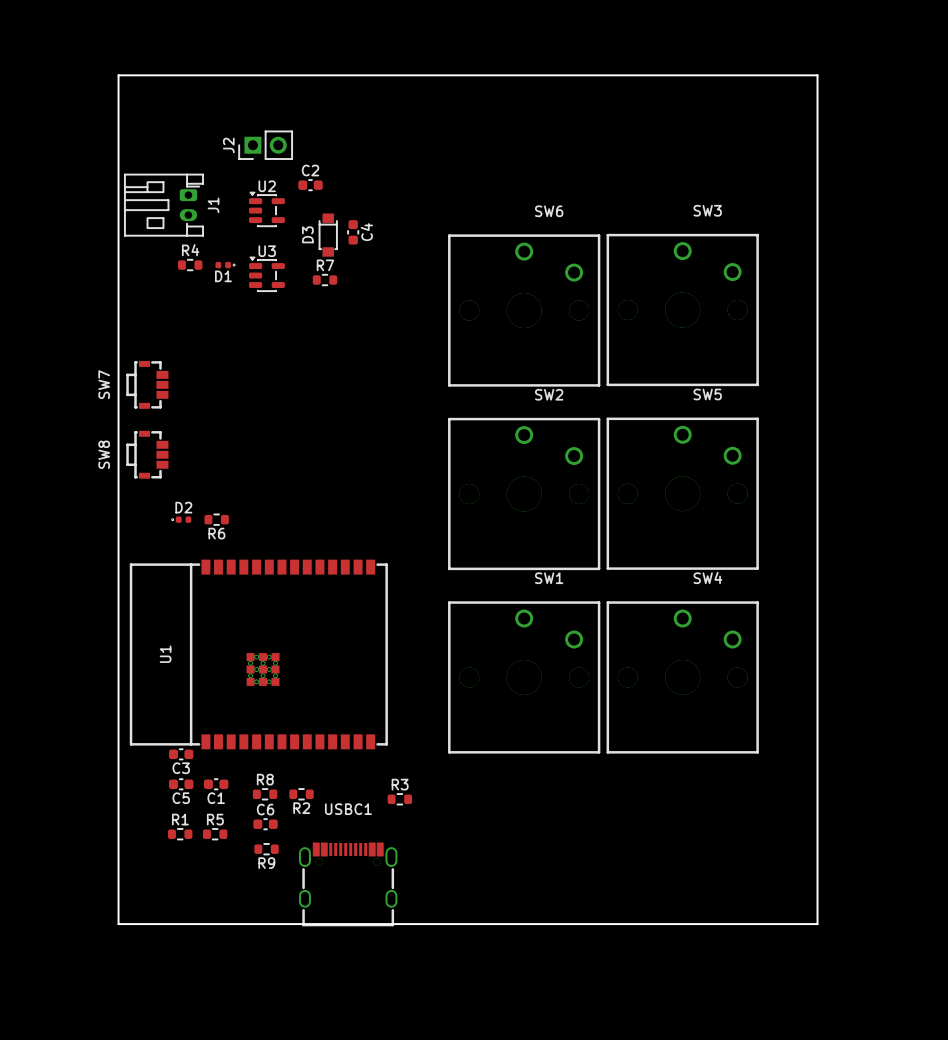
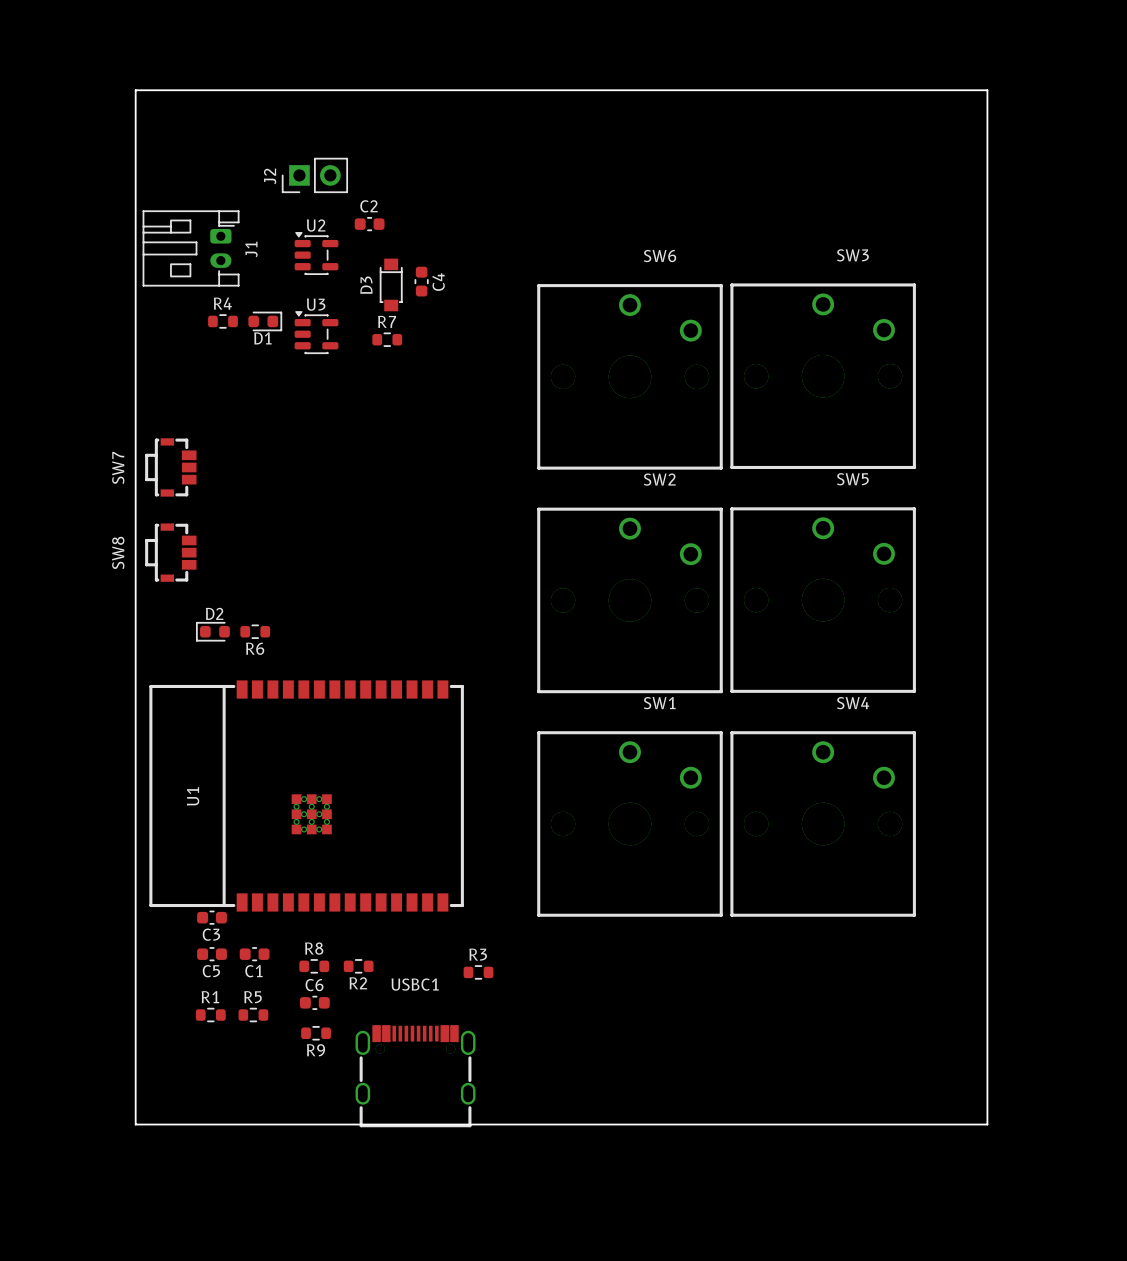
D1 footprint: [215, 261, 236, 269] -> [248, 311, 283, 332]
D2 footprint: [171, 516, 192, 523] -> [196, 622, 230, 642]

